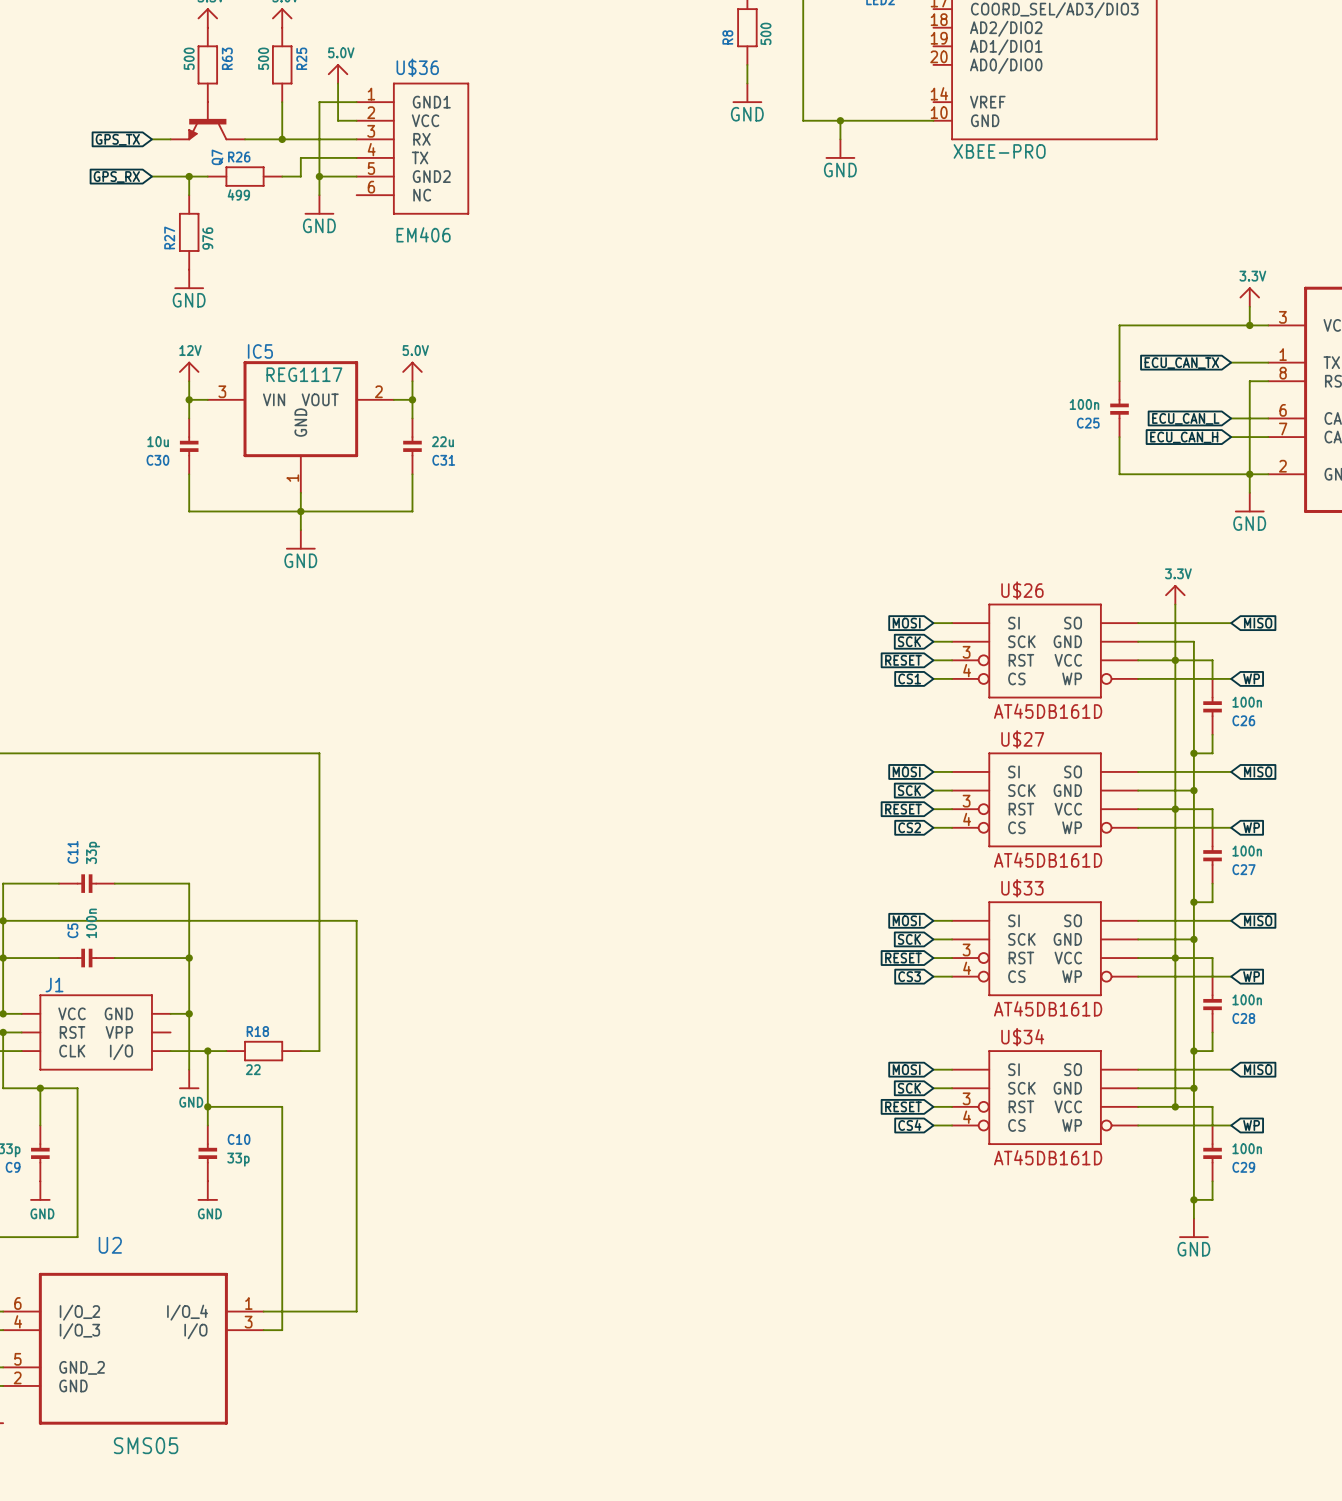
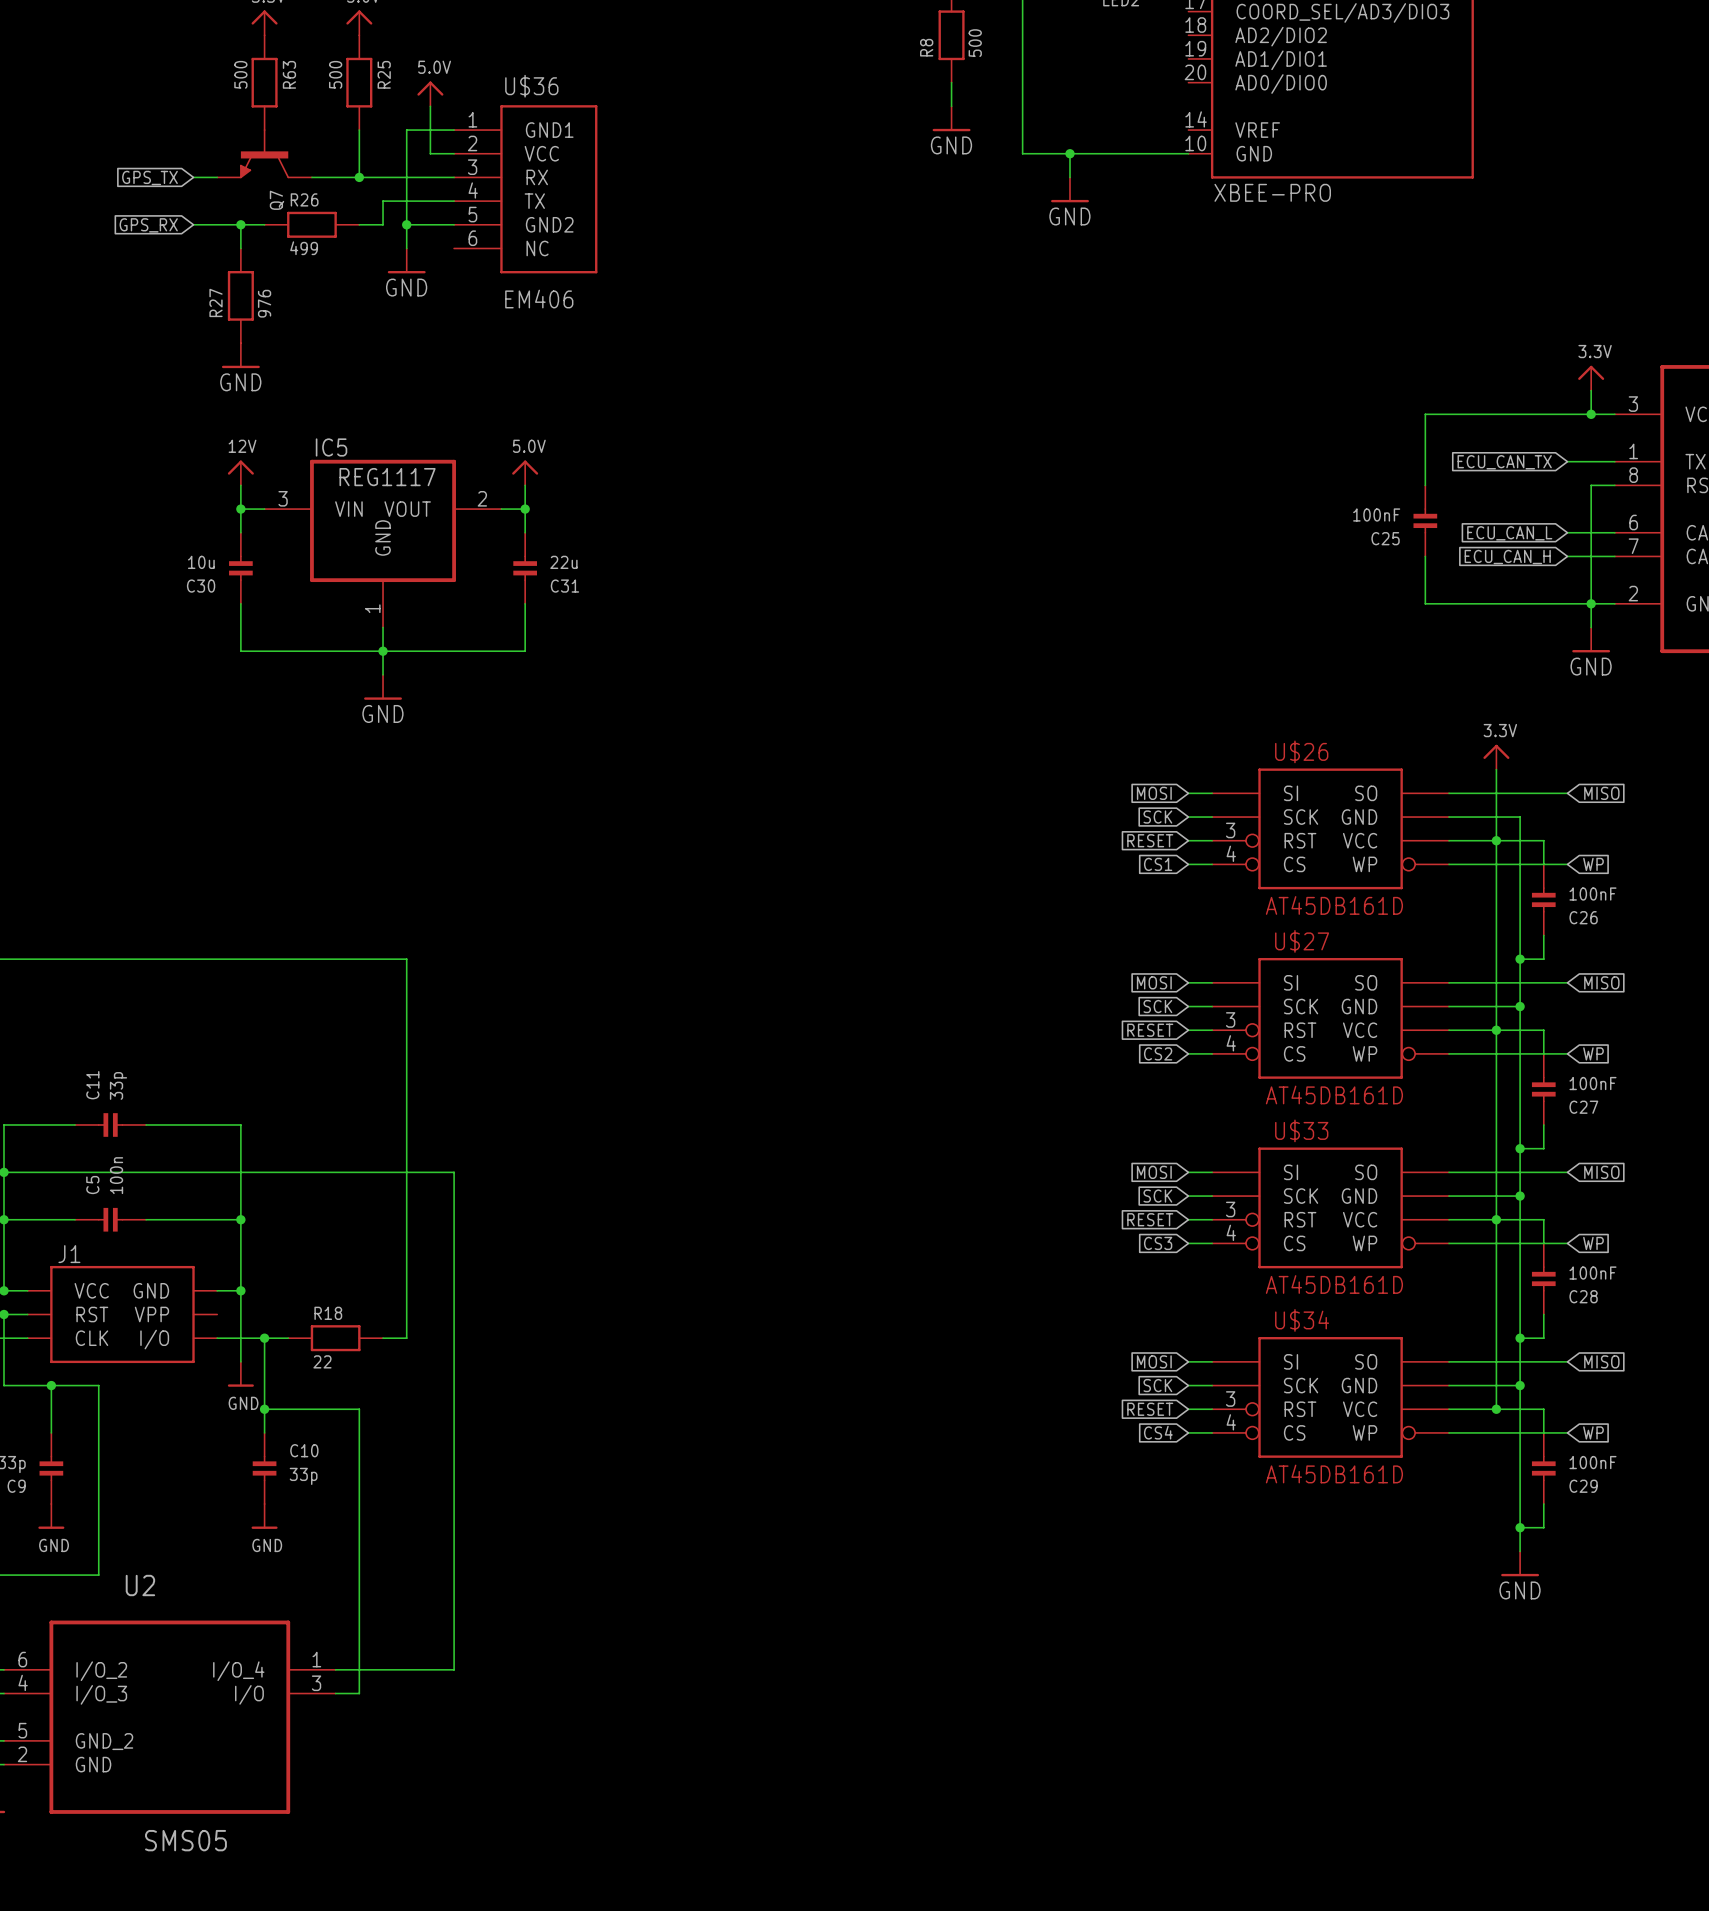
C25 value: 100n (1084, 404) -> 100nF (1376, 514)
C26 value: 100n (1247, 702) -> 100nF (1592, 894)
C27 value: 100n (1247, 851) -> 100nF (1592, 1083)
C28 value: 100n (1247, 999) -> 100nF (1592, 1273)
C29 value: 100n (1247, 1148) -> 100nF (1592, 1462)

